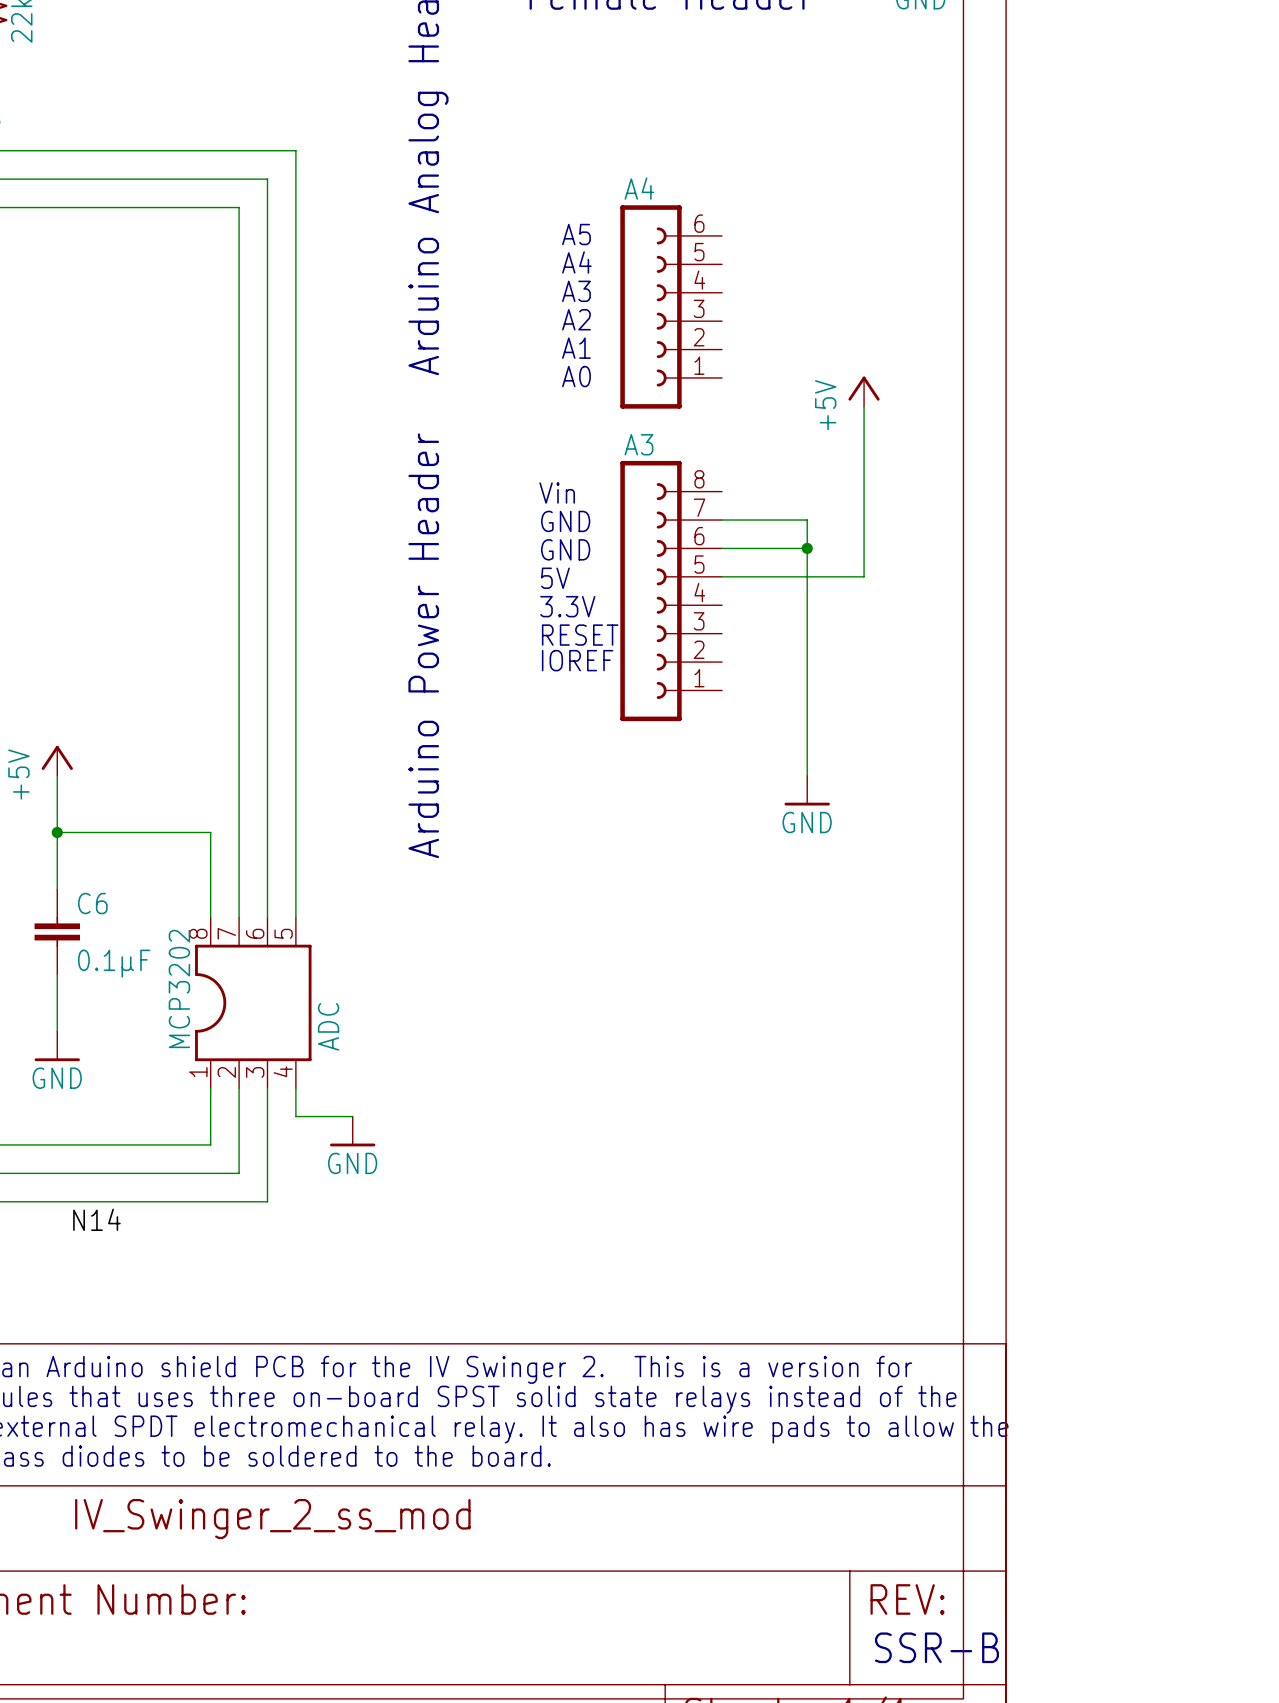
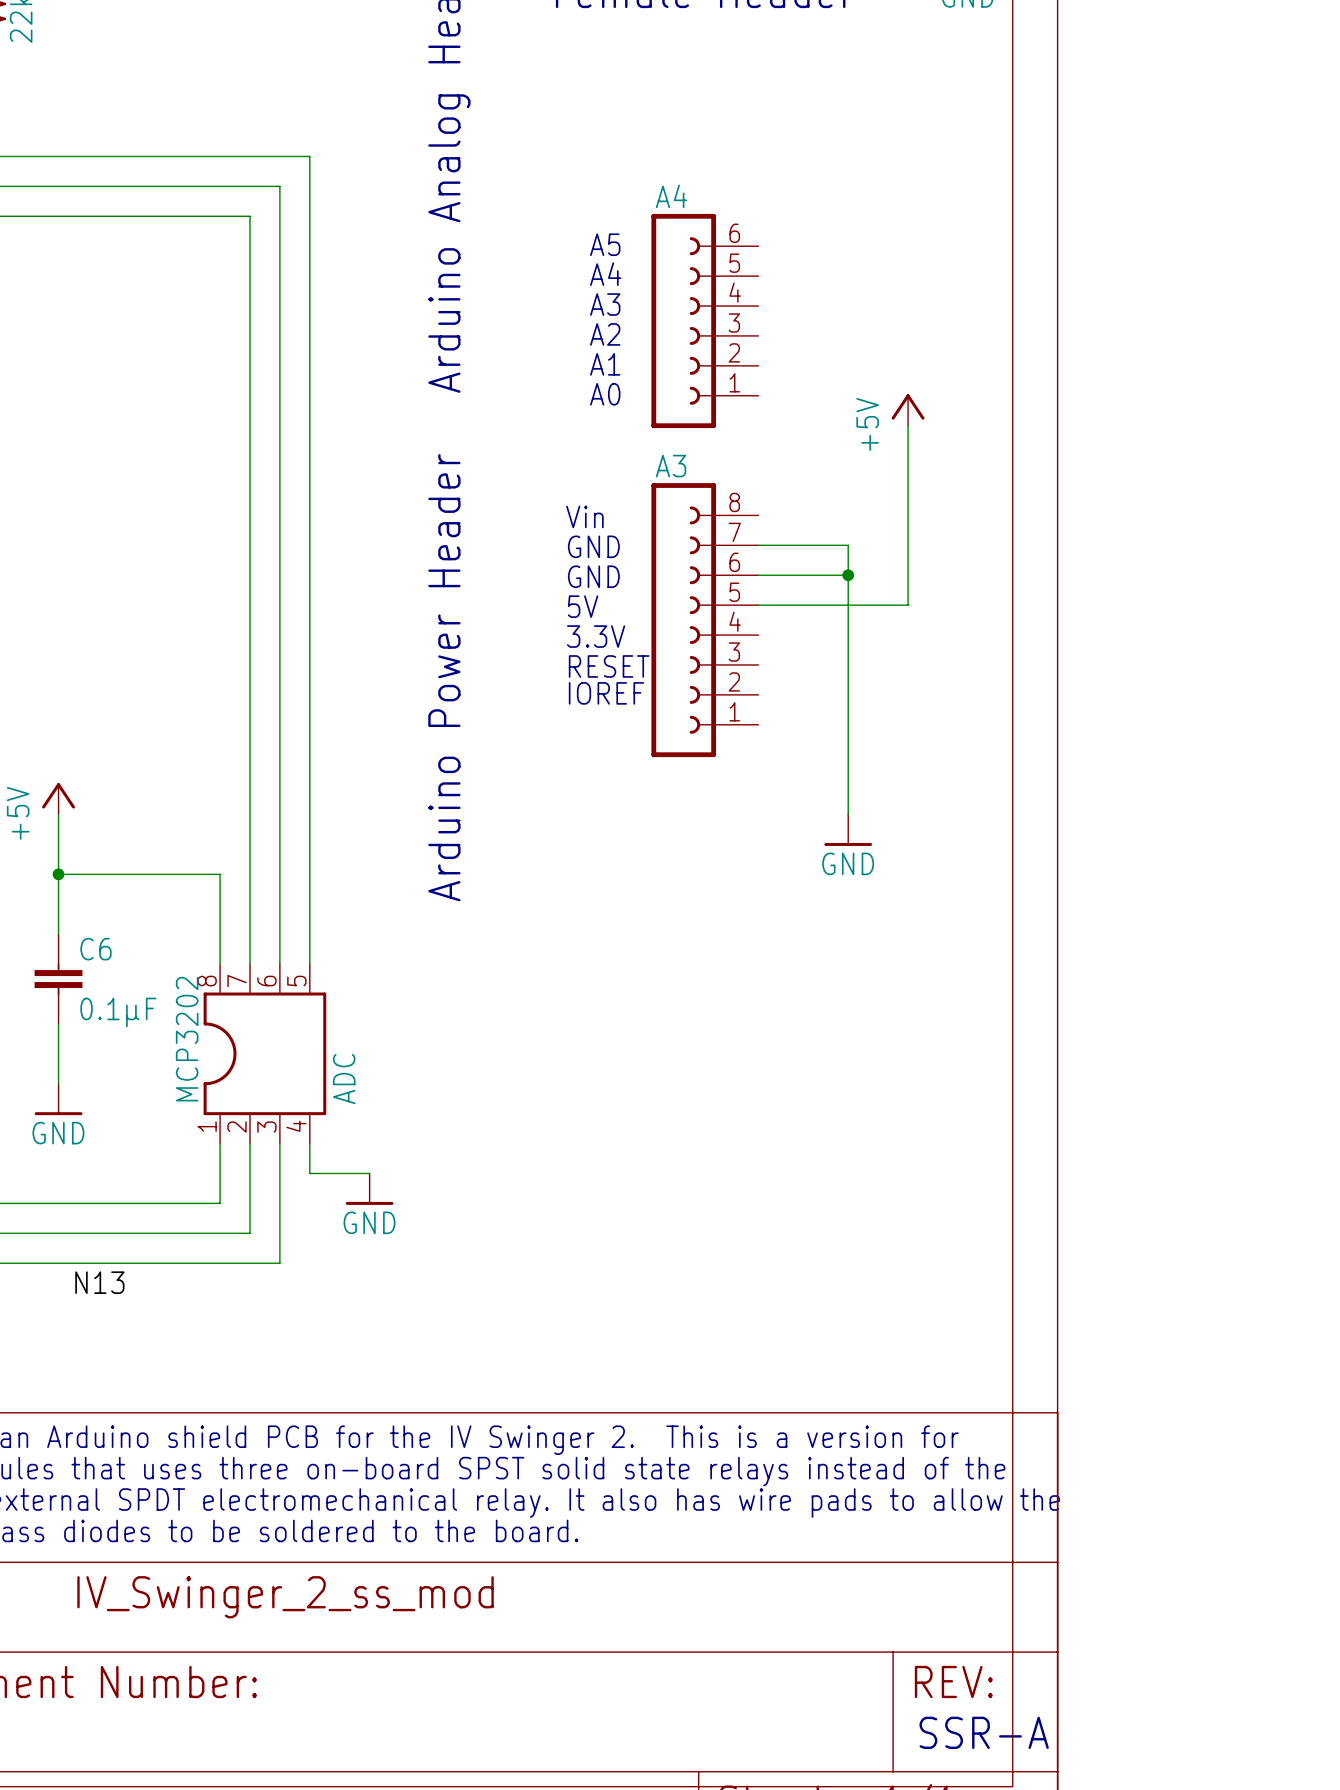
label: N14 (96, 1219) -> N13 (99, 1282)
text: SSR-B (936, 1647) -> SSR-A (984, 1732)

